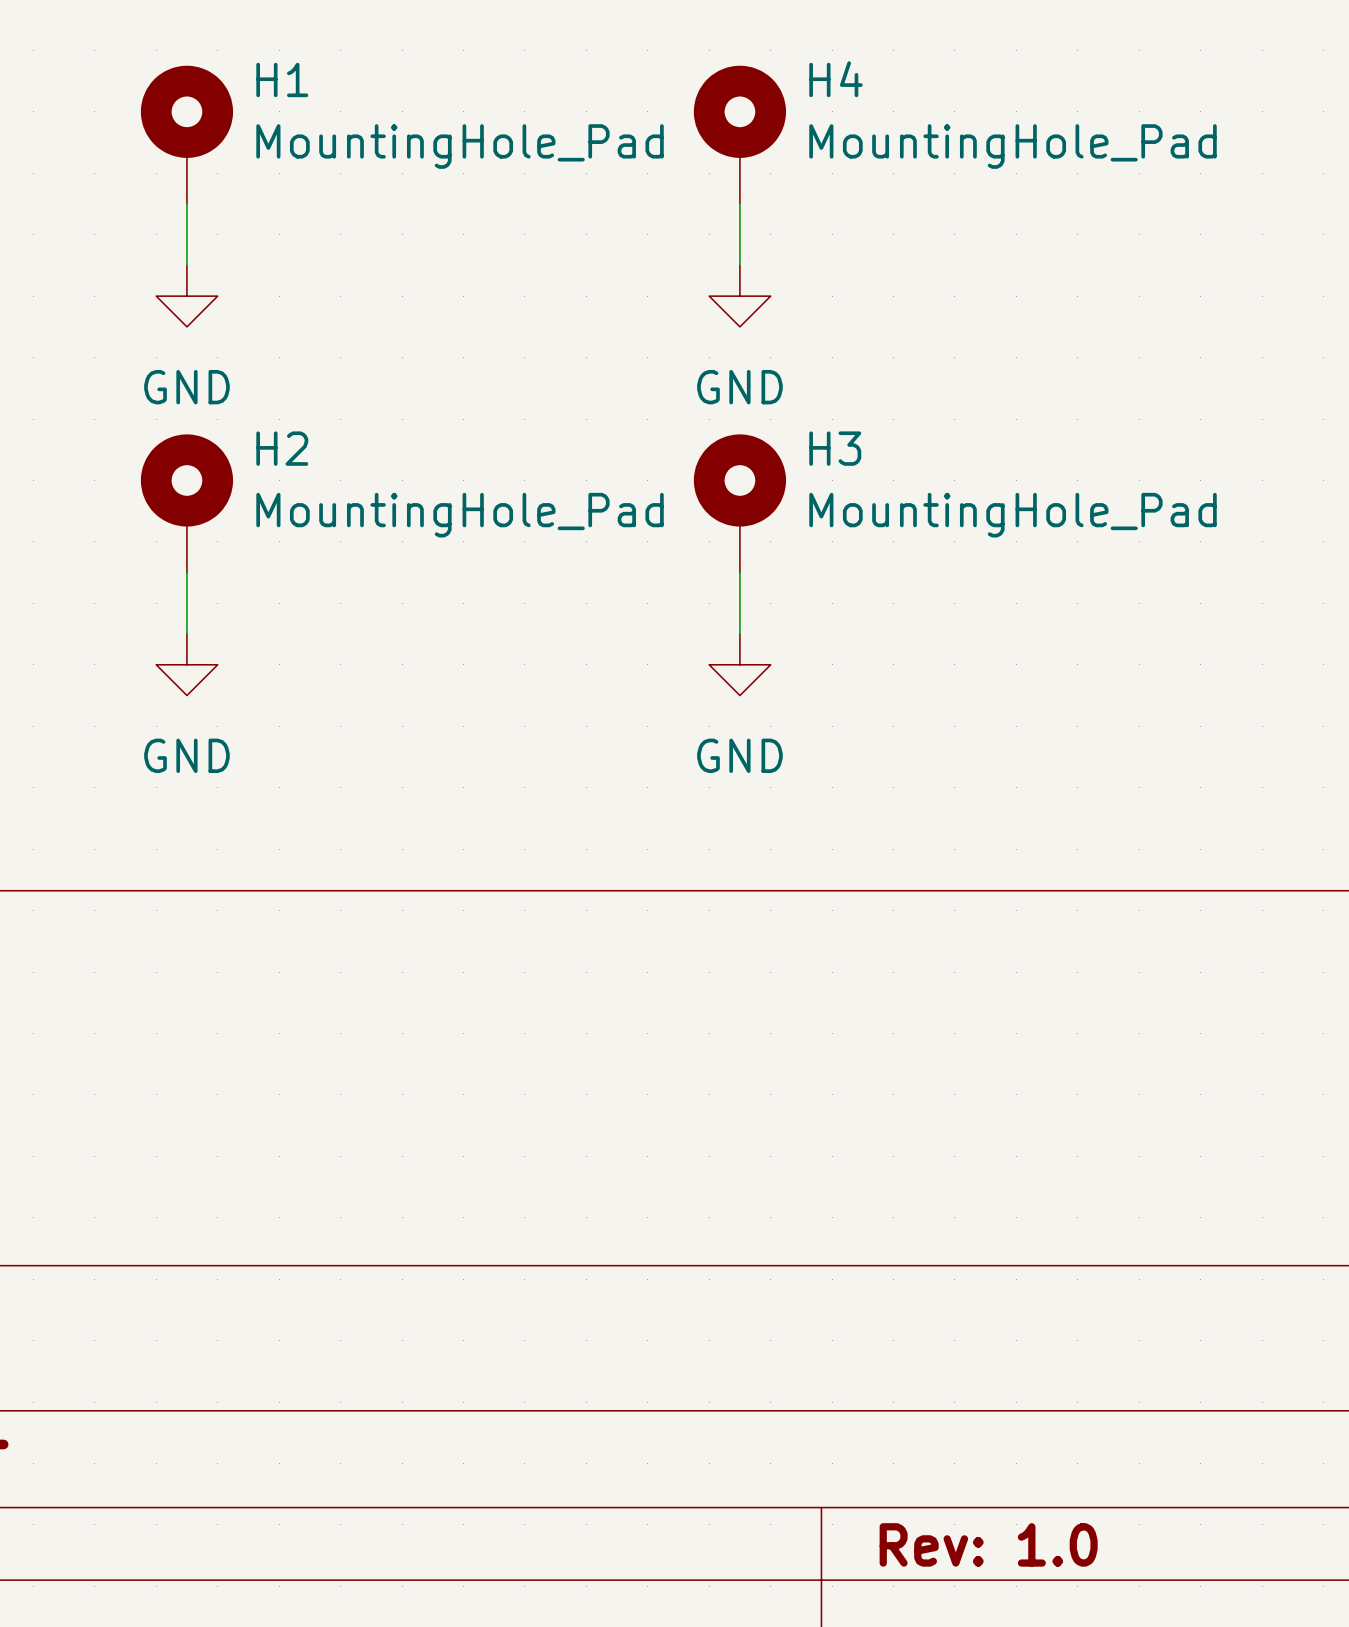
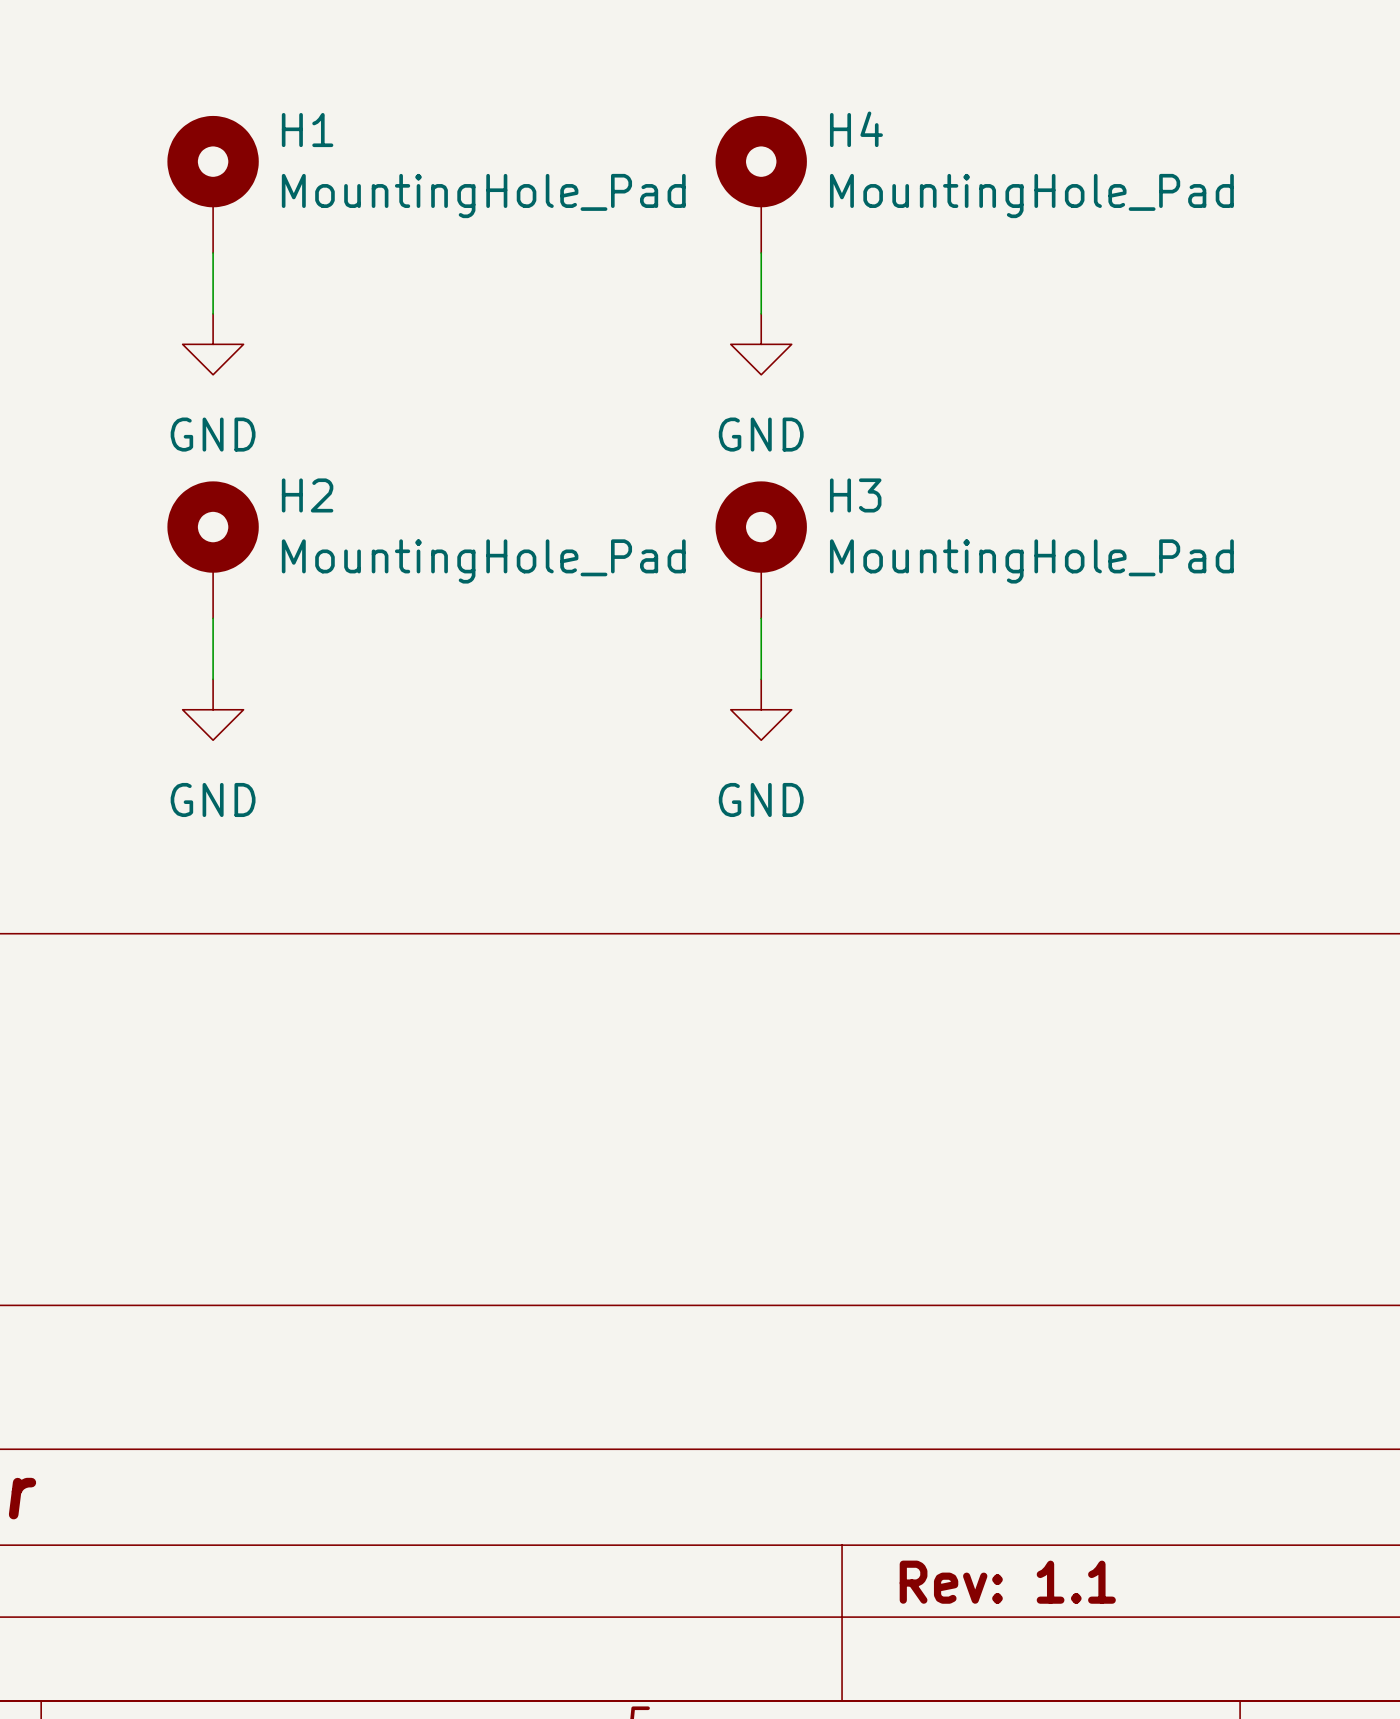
title block: Rev: 1.0 (988, 1544) -> Rev: 1.1 (1007, 1582)

